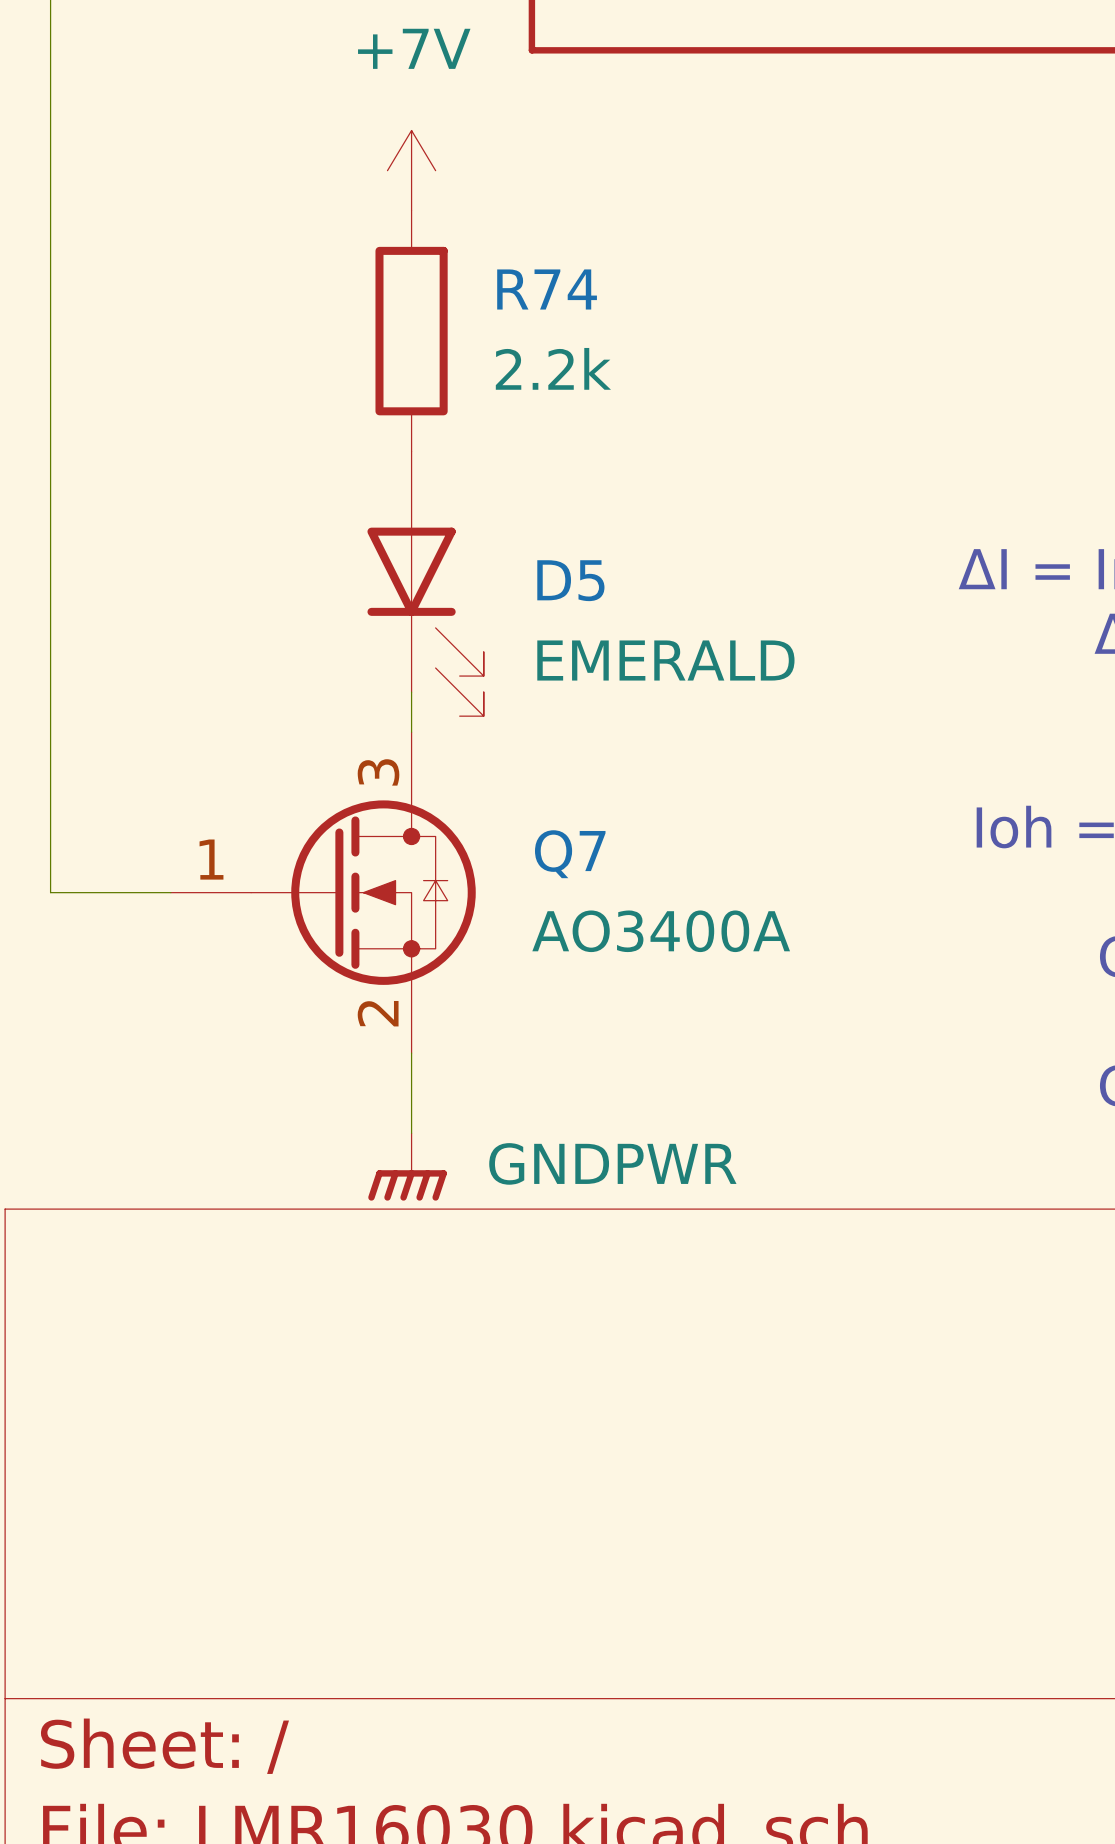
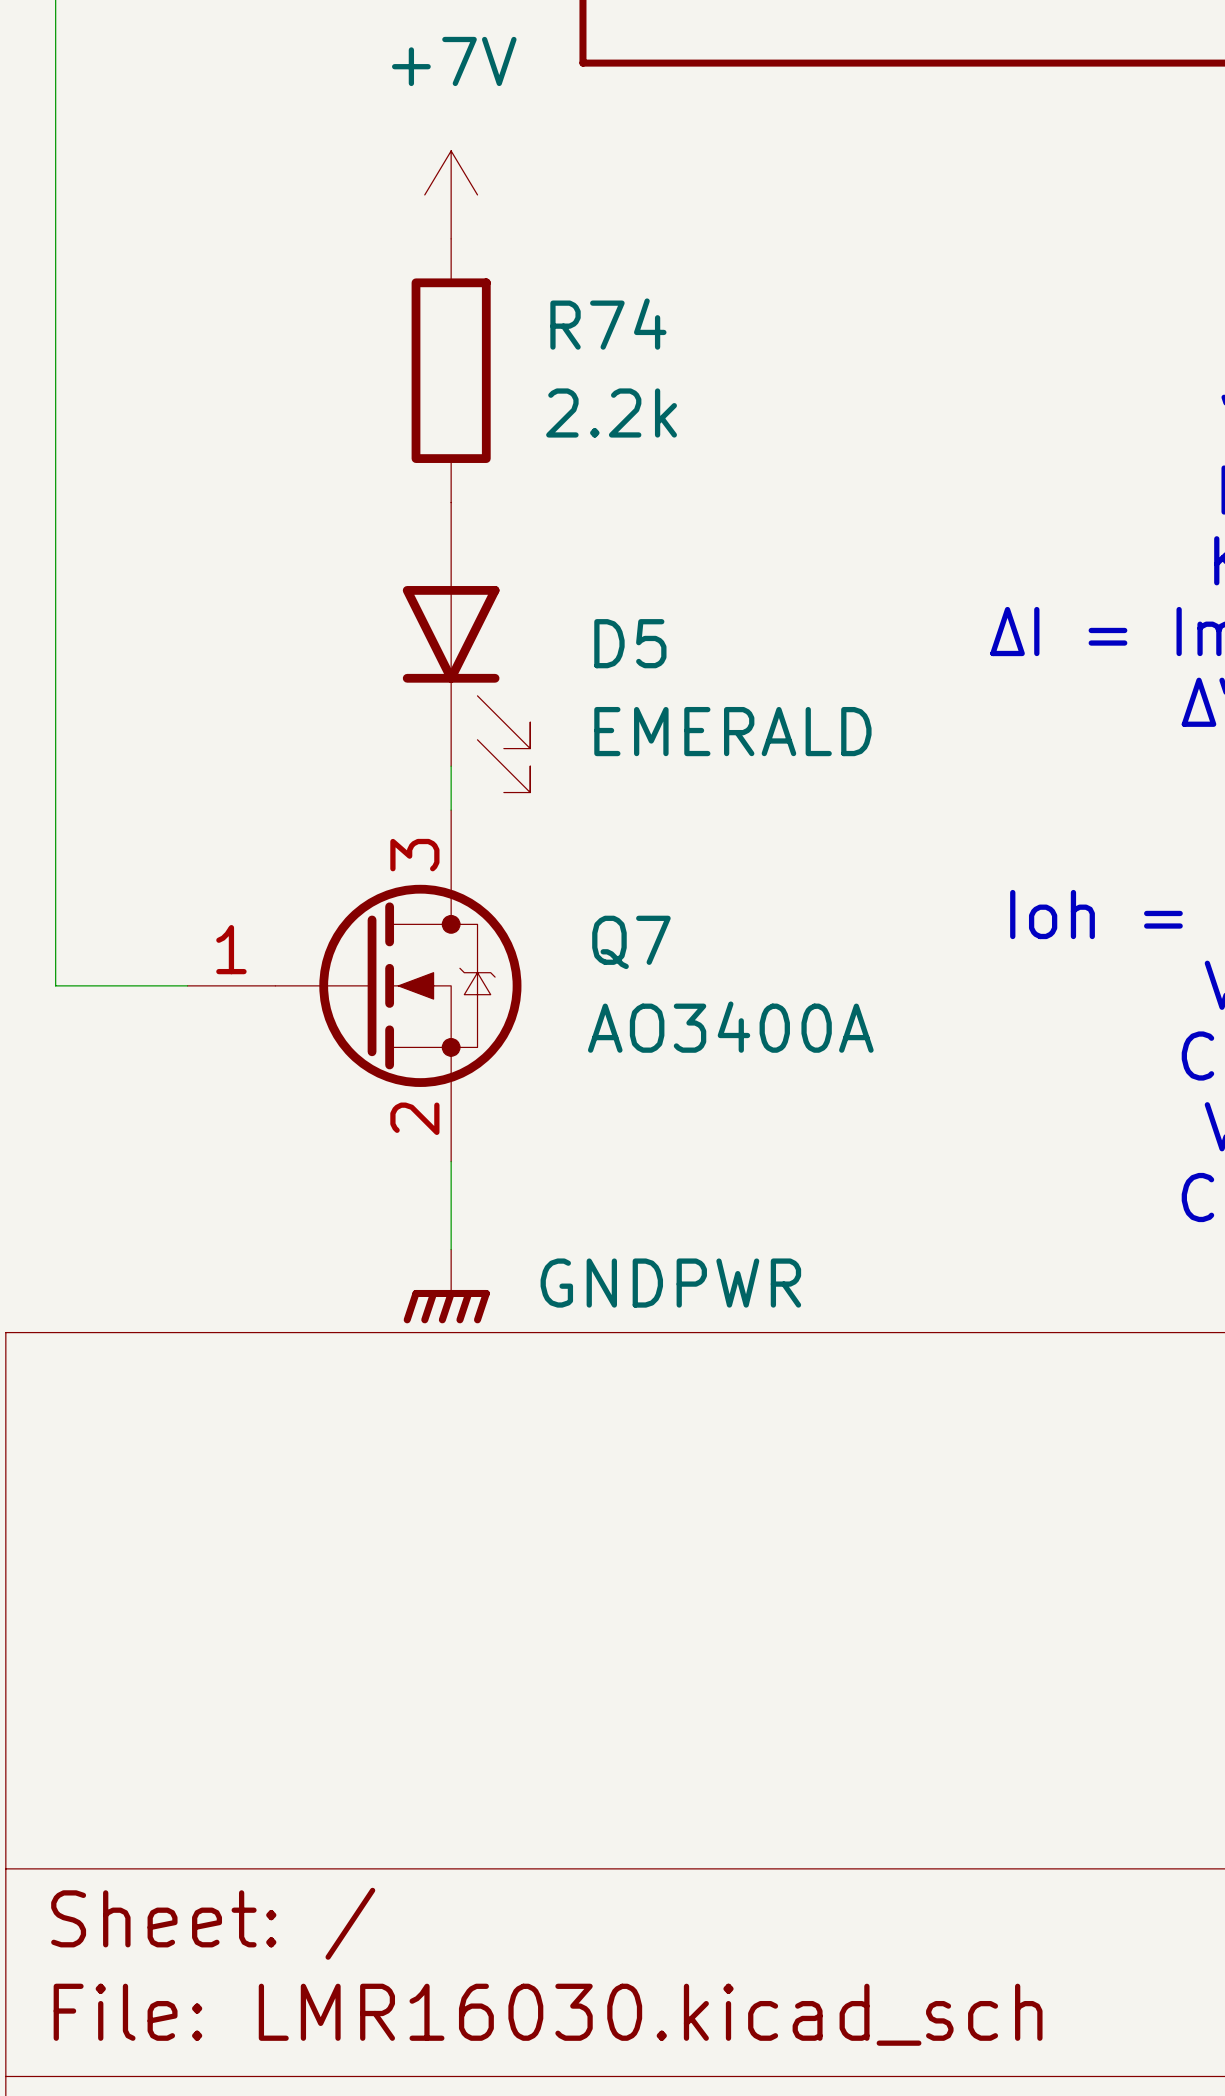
Q7 symbol: [170, 732, 476, 1054] -> [187, 810, 522, 1162]

